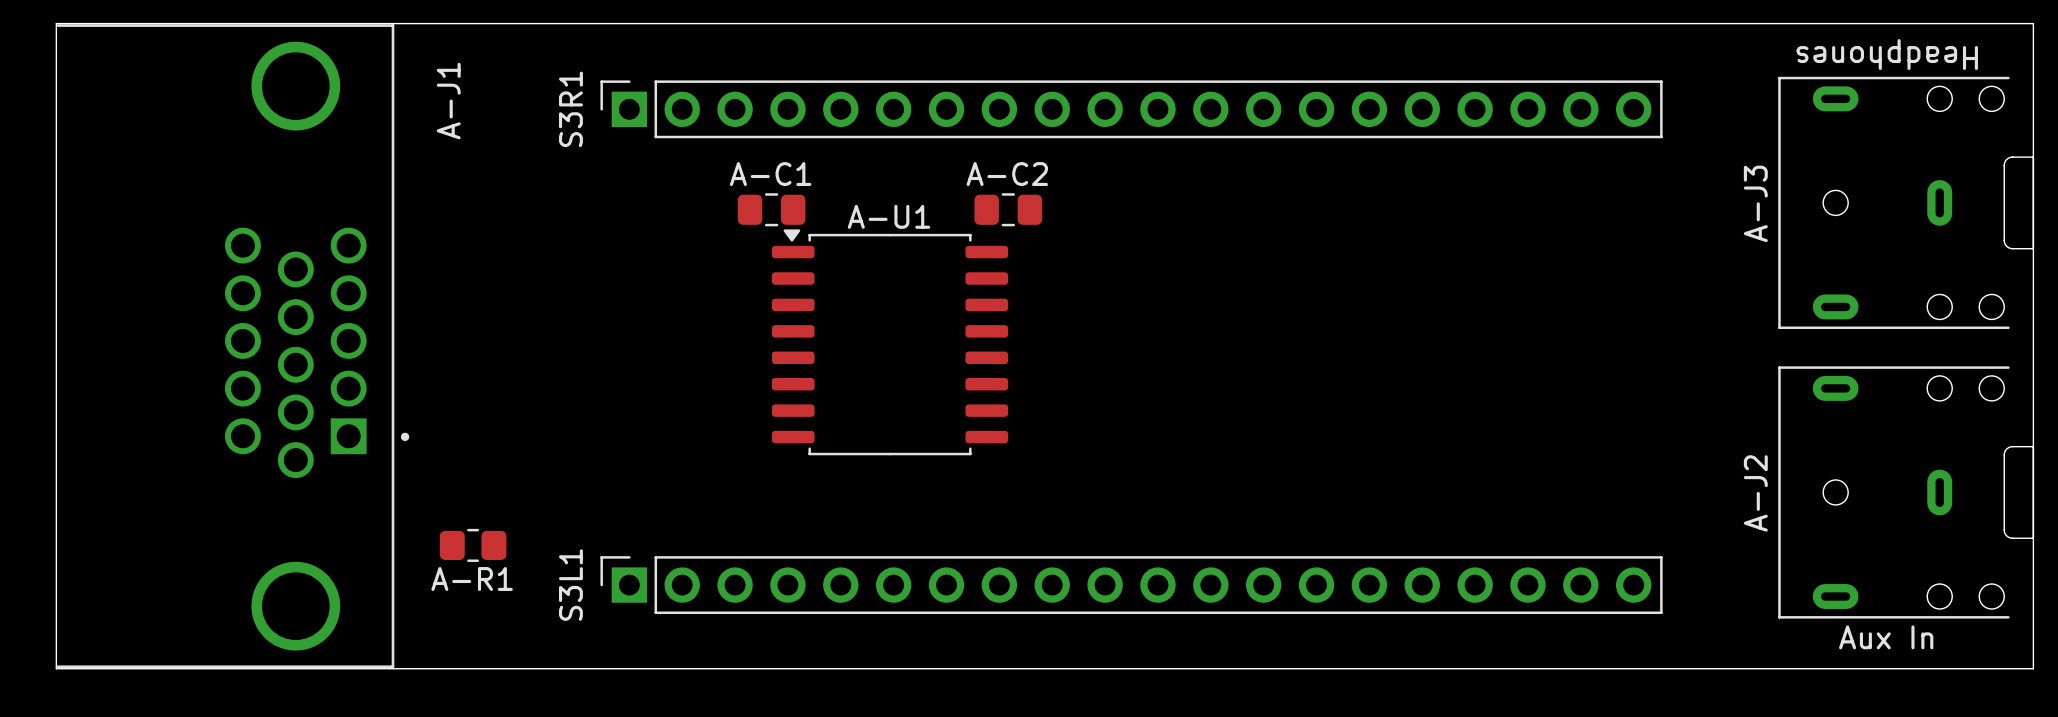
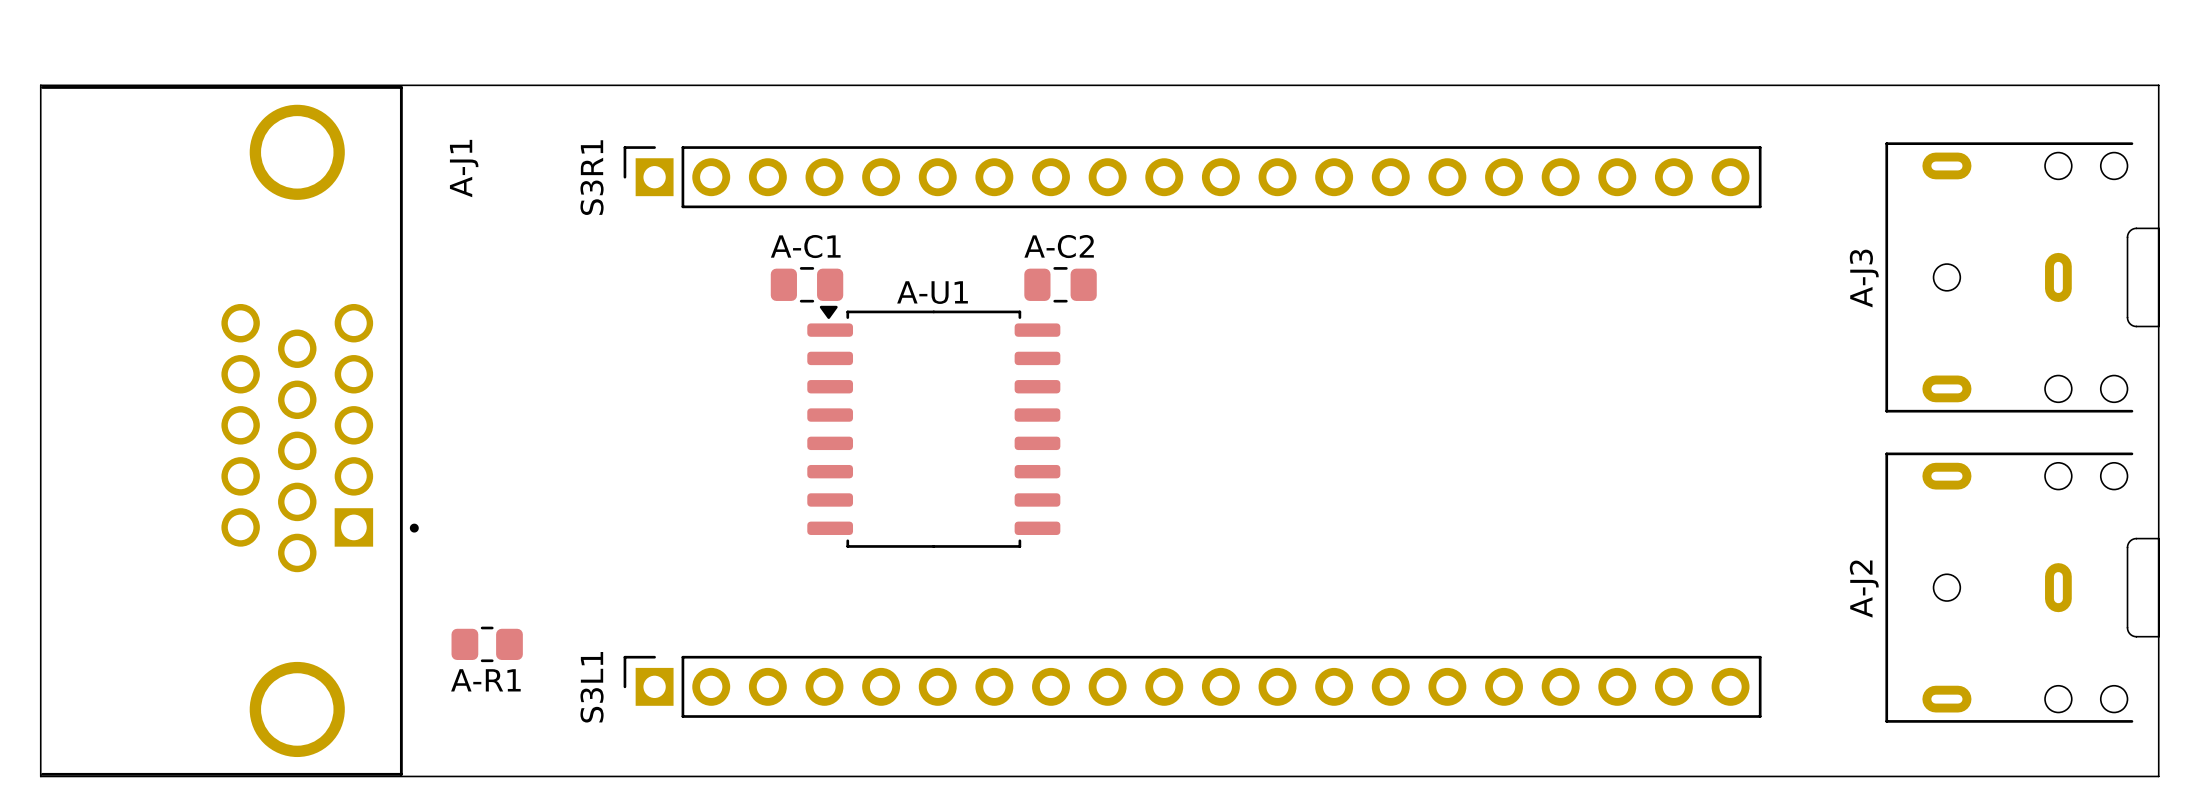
A-J3 value: Headphones (1887, 54) -> none
A-J2 value: Aux In (1886, 637) -> none

